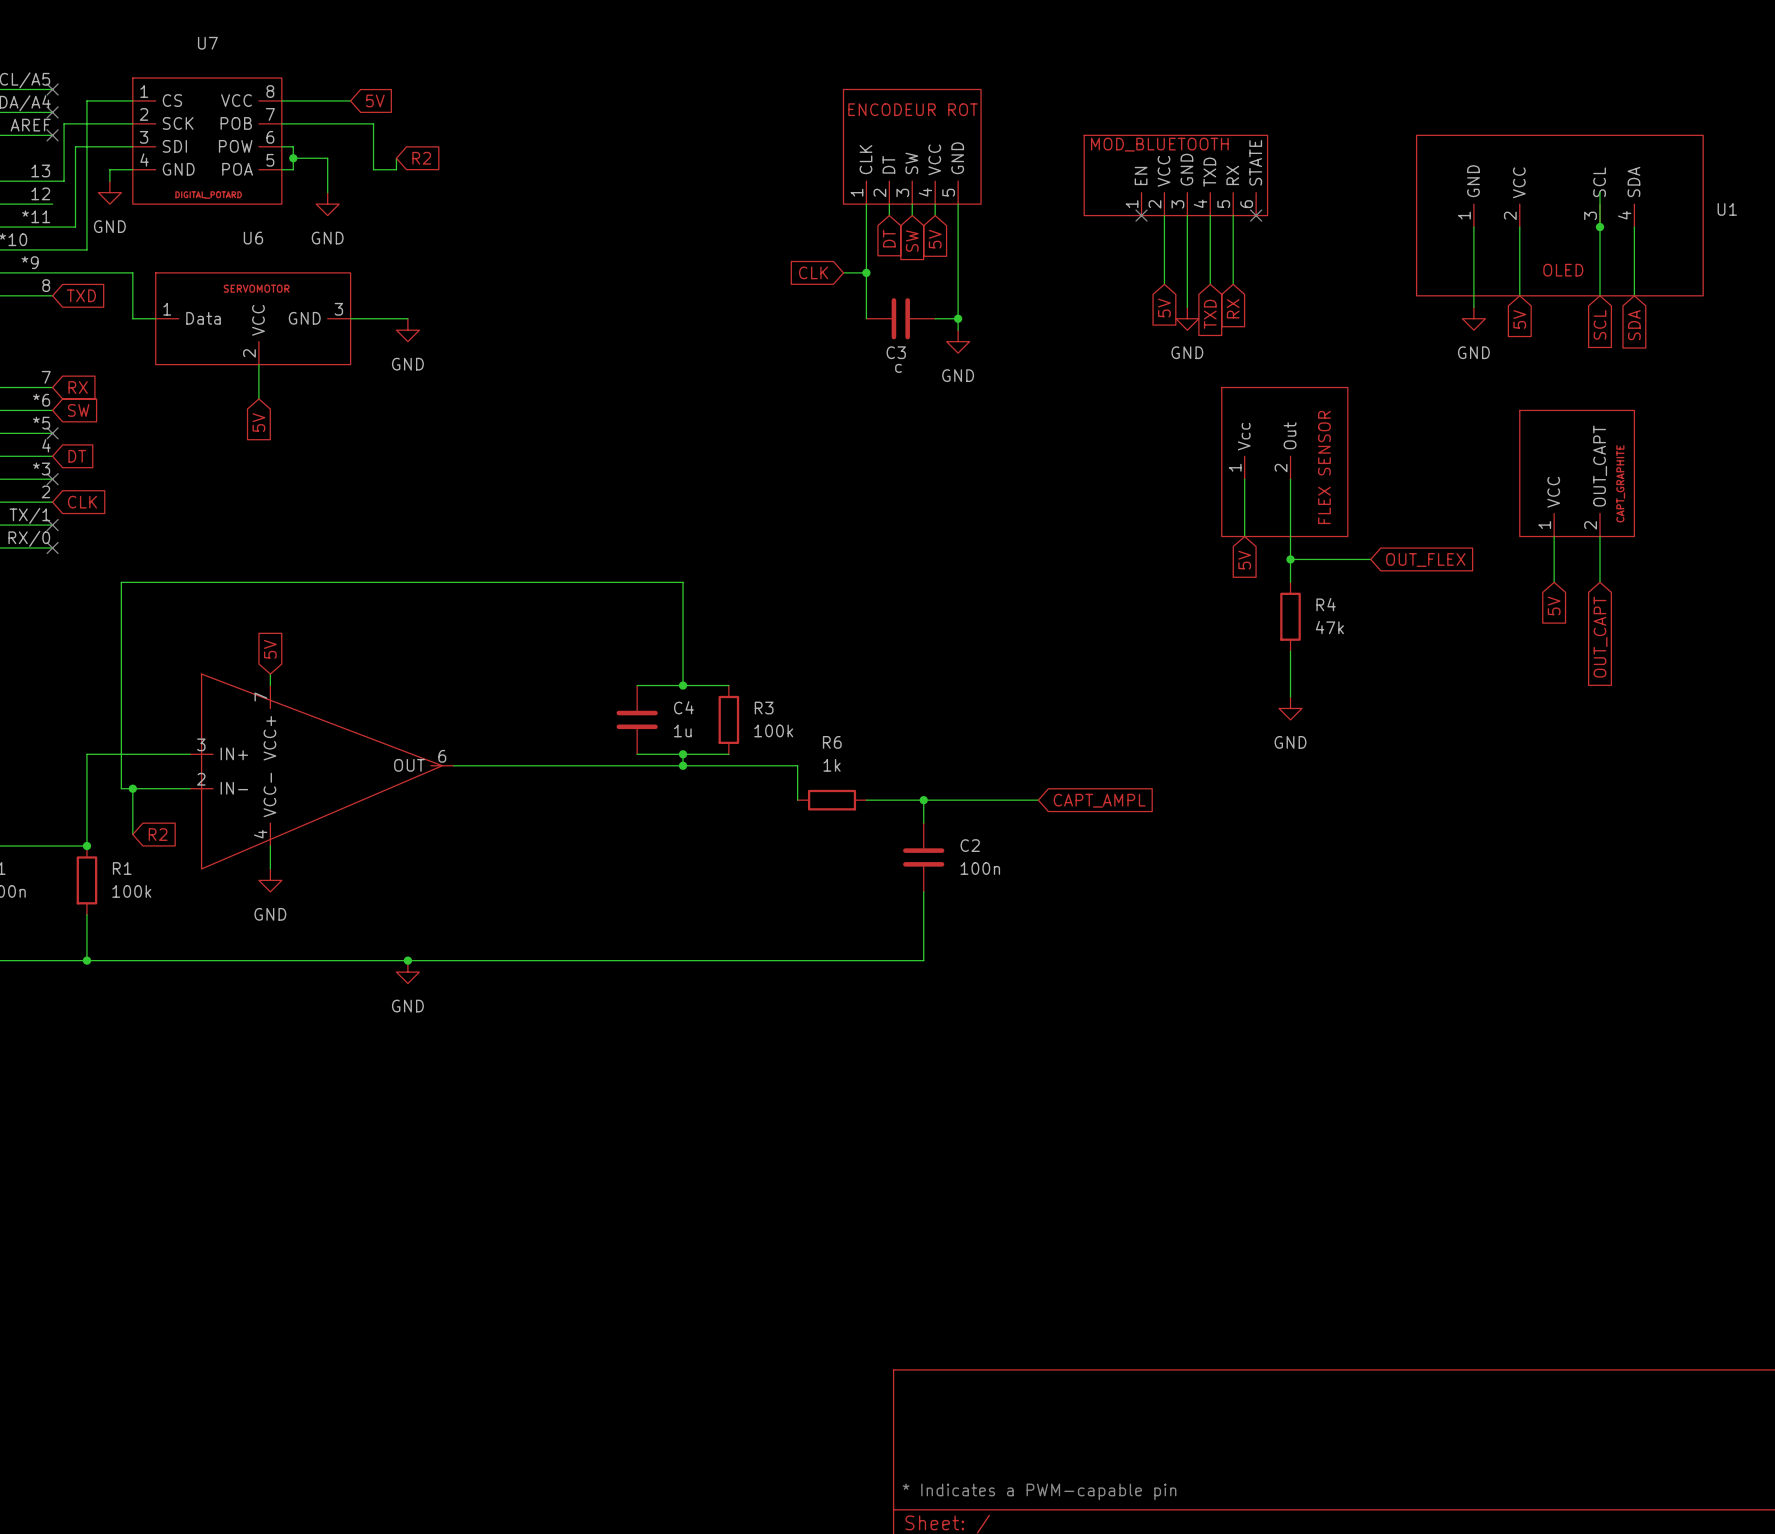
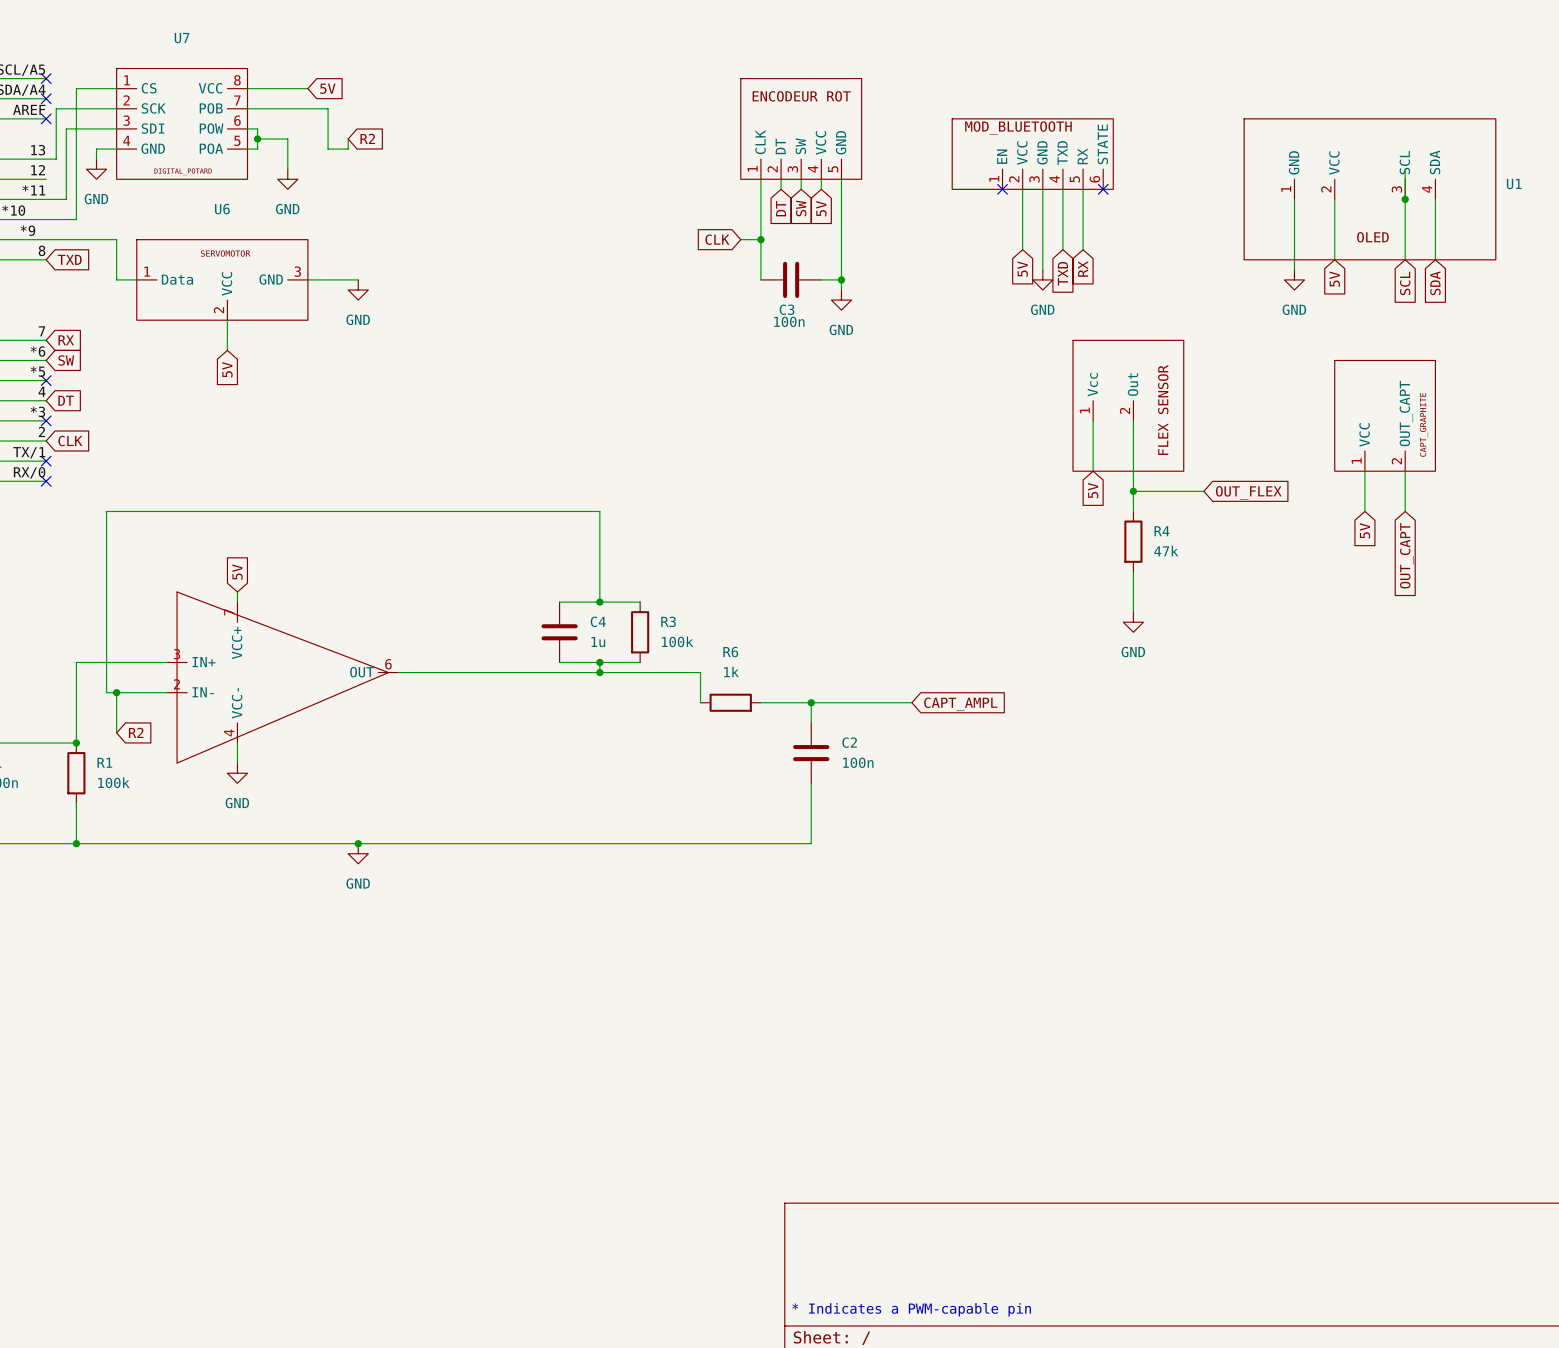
C3 value: c (898, 368) -> 100n (789, 321)

